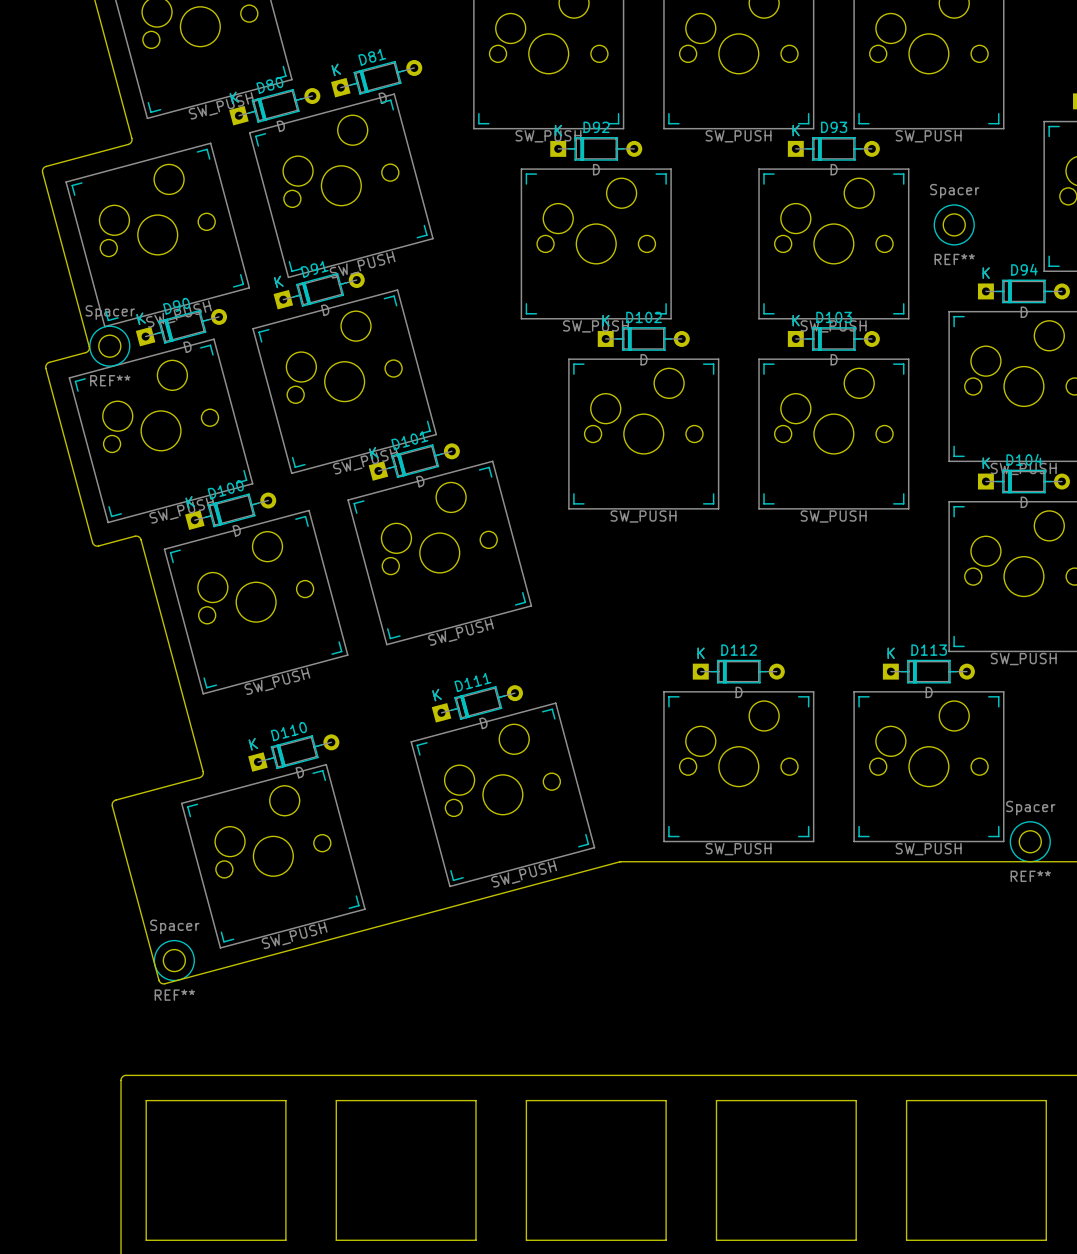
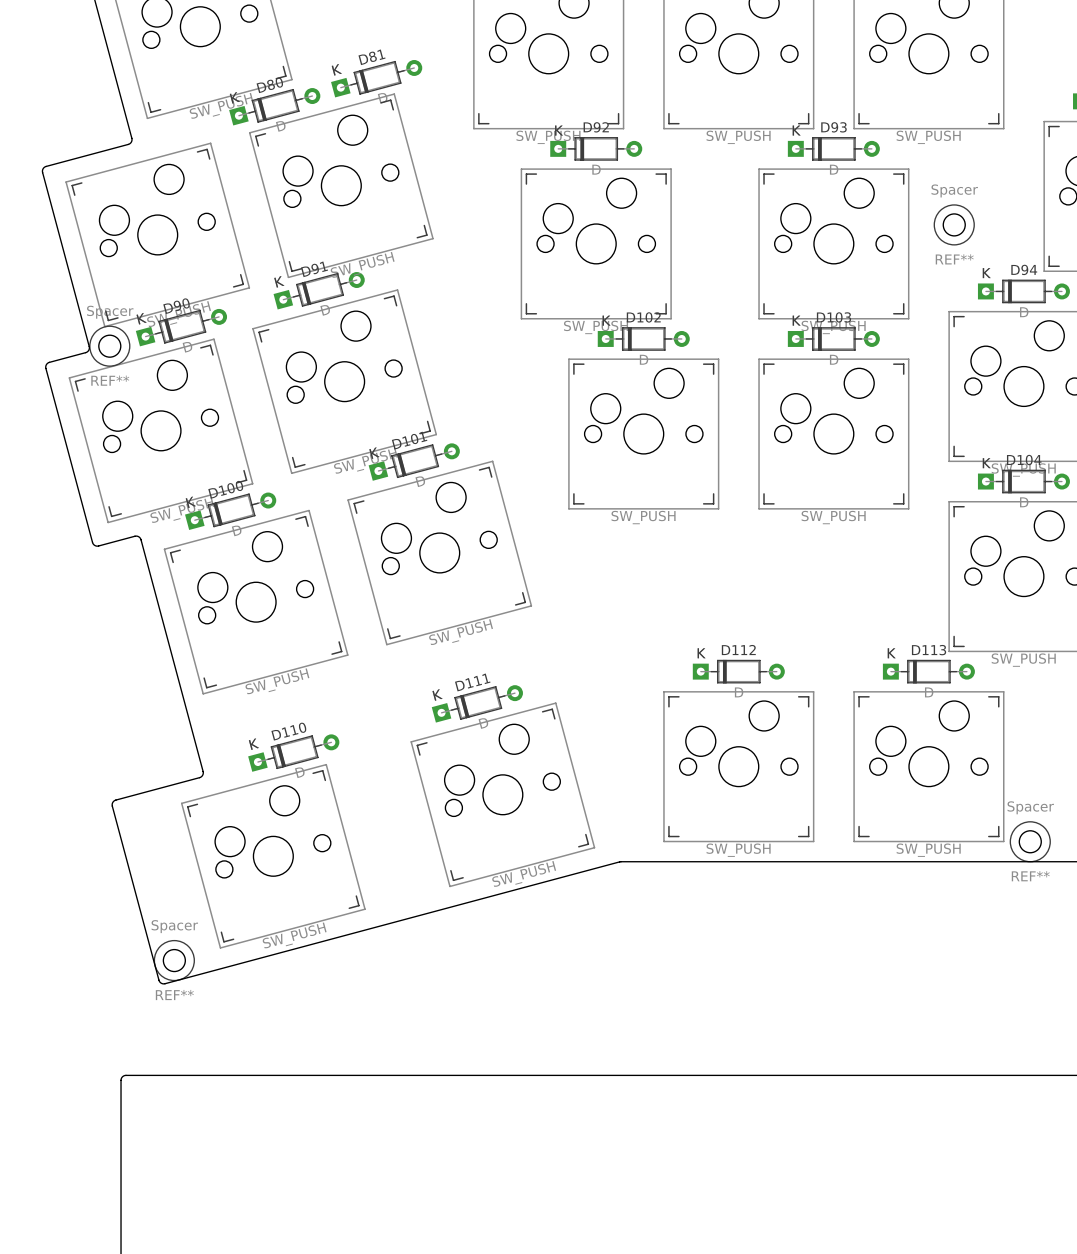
board edge: (146, 1100) (285, 1100) (285, 1240) (146, 1240) (146, 1100) -> none
board edge: (336, 1100) (476, 1100) (476, 1240) (336, 1240) (336, 1100) -> none
board edge: (526, 1100) (666, 1100) (666, 1240) (526, 1240) (526, 1100) -> none
board edge: (716, 1100) (856, 1100) (856, 1240) (716, 1240) (716, 1100) -> none
board edge: (906, 1100) (906, 1240) (1046, 1240) (1046, 1100) (906, 1100) -> none

